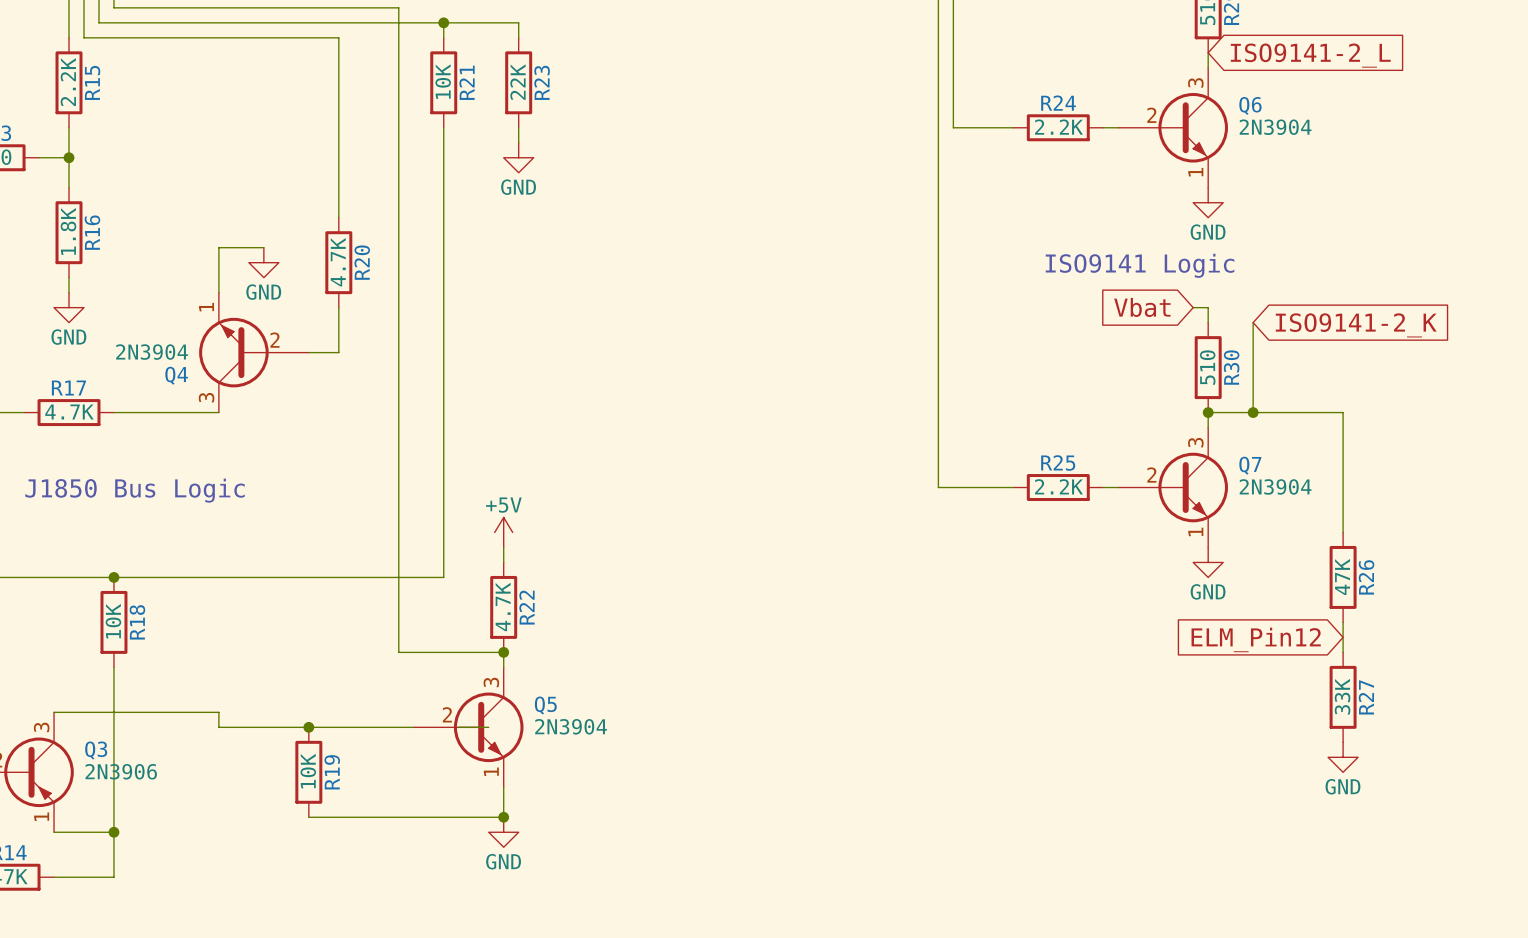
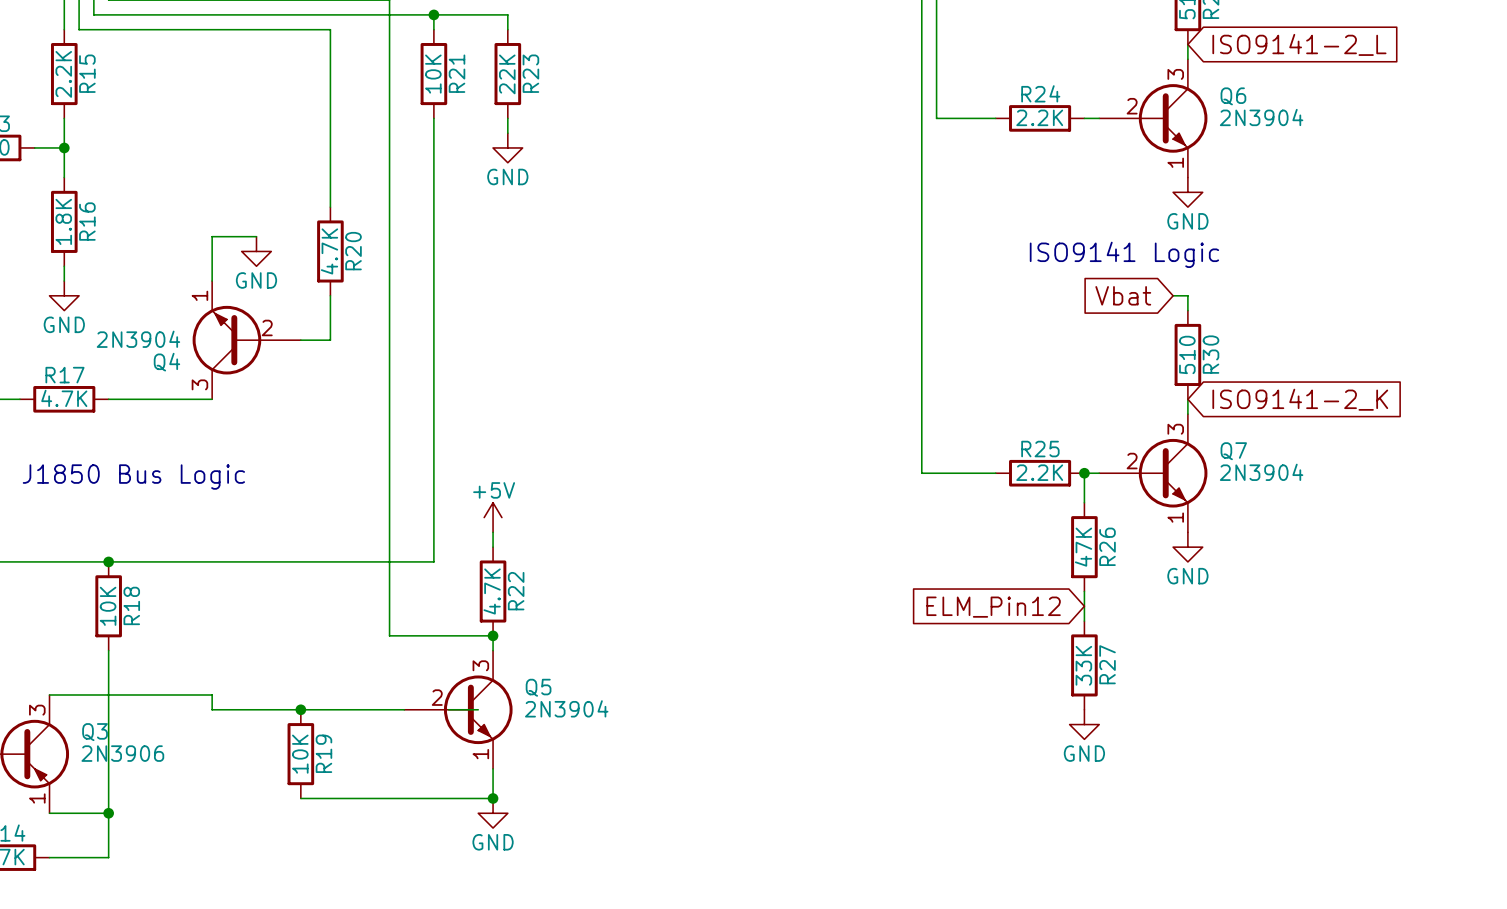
wire: (1253, 322) (1253, 412) -> none
global label position: ISO9141-2_K (1356, 325) -> ISO9141-2_K (1300, 399)
wire: (1208, 412) (1343, 412) (1343, 532) -> none
junction: (1208, 412) -> none
junction: (1253, 412) -> none
wire: none -> (1084, 473) (1084, 502)
junction: none -> (1084, 473)
R26 position: (1343, 577) -> (1084, 547)
wire: (1343, 622) (1343, 652) -> (1084, 591) (1084, 621)
global label position: ELM_Pin12 (1256, 639) -> ELM_Pin12 (993, 607)
R27 position: (1343, 697) -> (1084, 665)
power symbol position: GND (1343, 757) -> GND (1084, 724)

